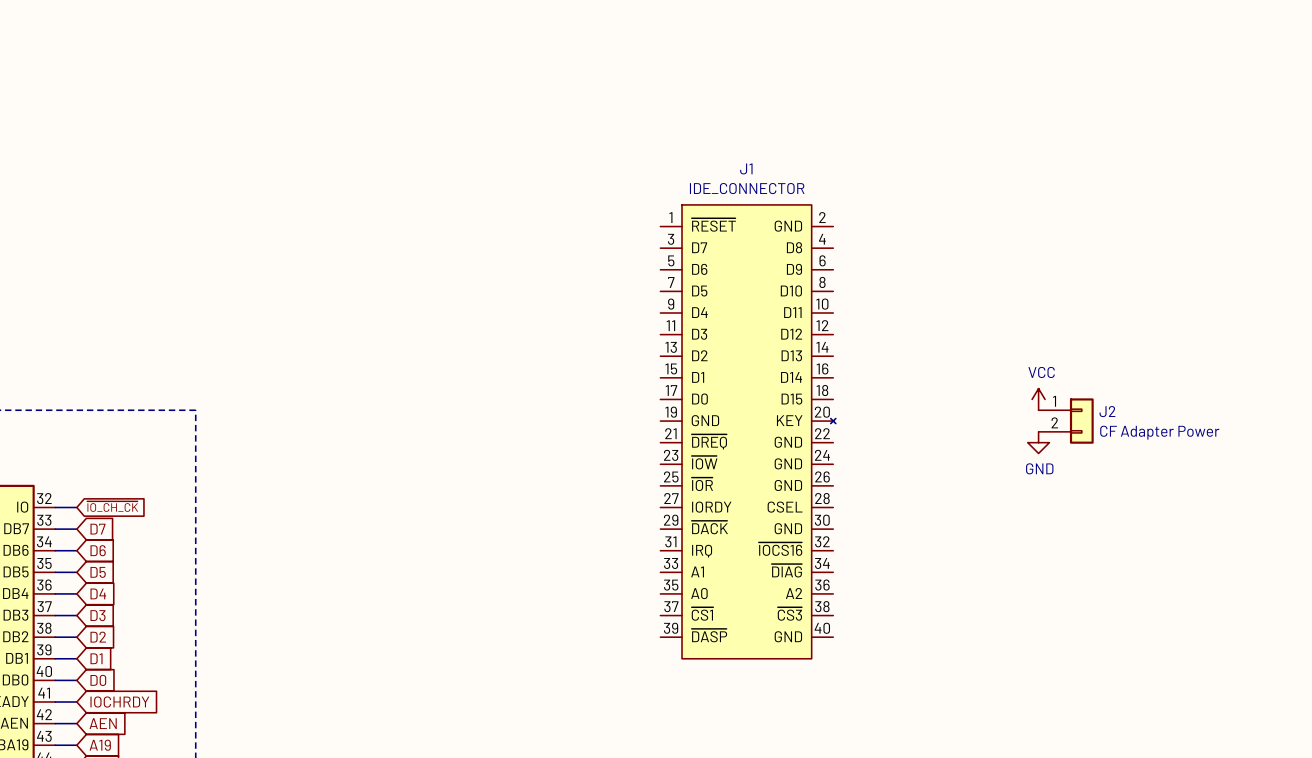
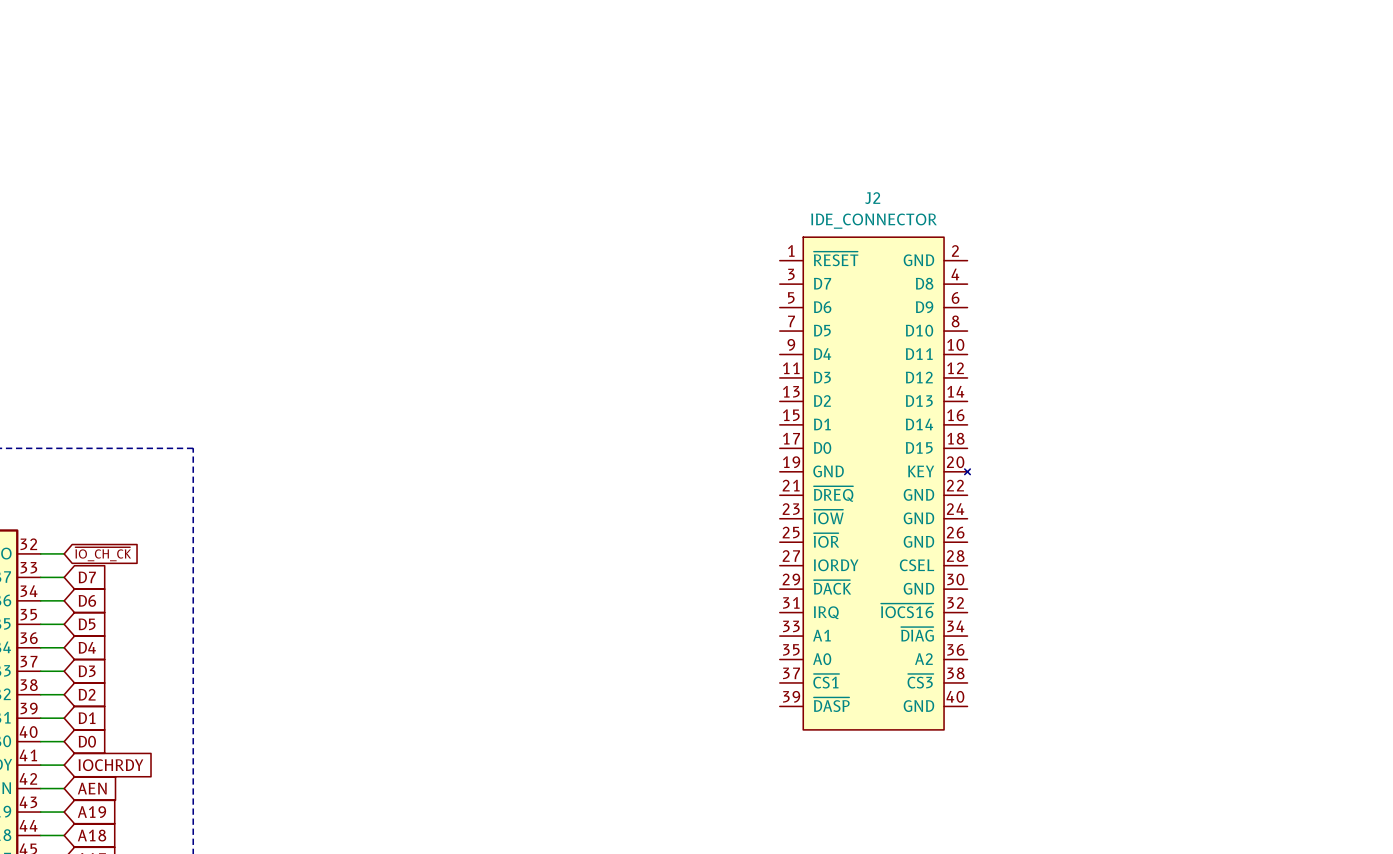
J2 symbol: [1038, 398, 1094, 444] -> [779, 237, 971, 730]
power symbol: VCC (1038, 399) -> none
J2 name position: J2 (1107, 411) -> J2 (872, 198)
J1: IDE_CONNECTOR (748, 431) -> none
J2 value: CF Adapter Power (1159, 432) -> IDE_CONNECTOR (874, 221)
power symbol: GND (1038, 442) -> none

